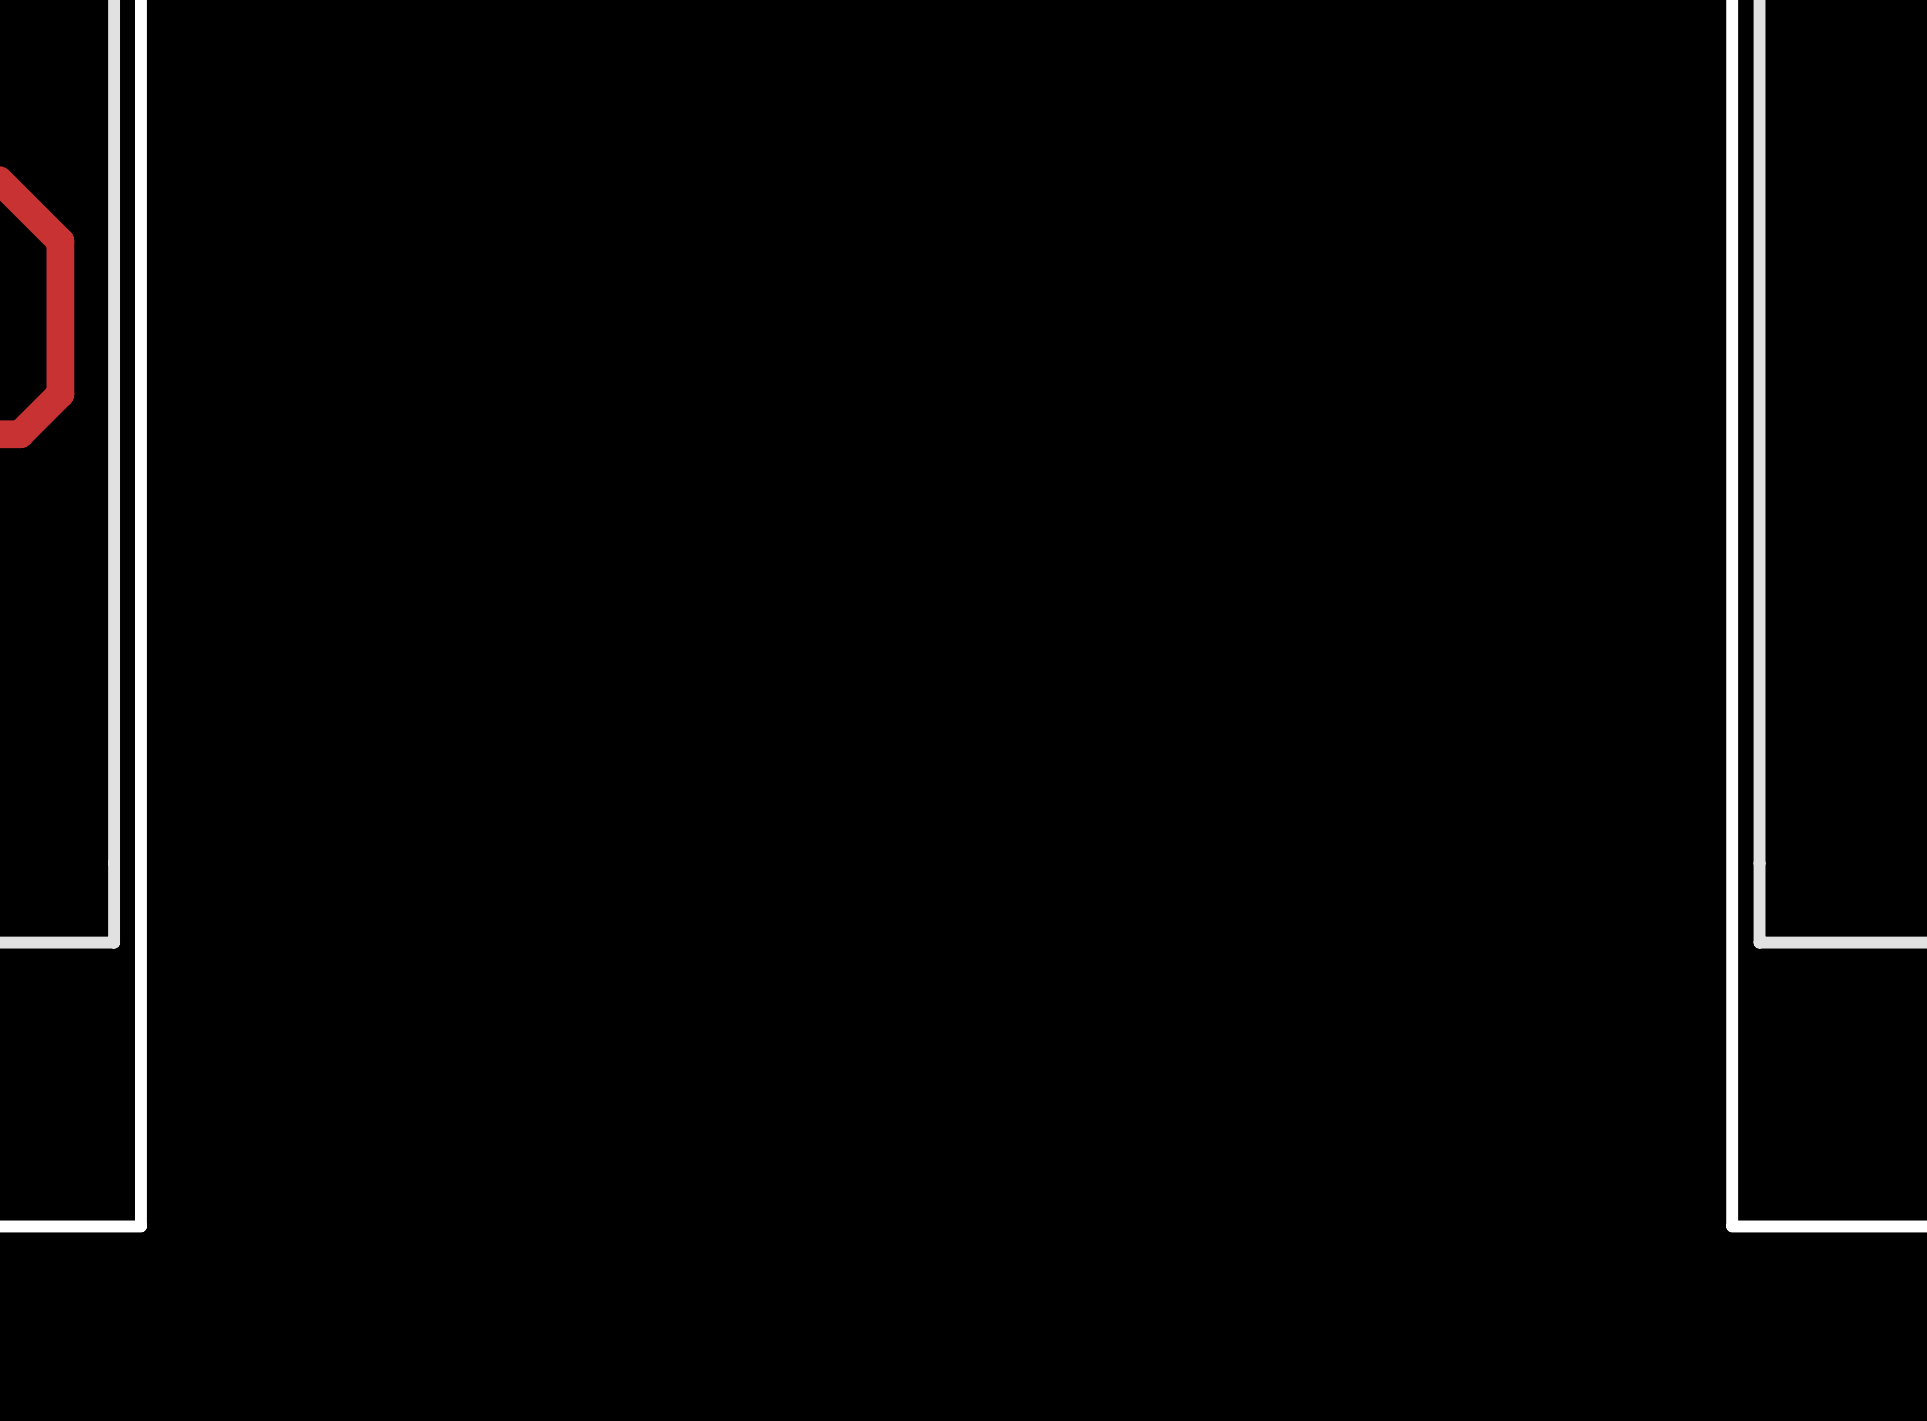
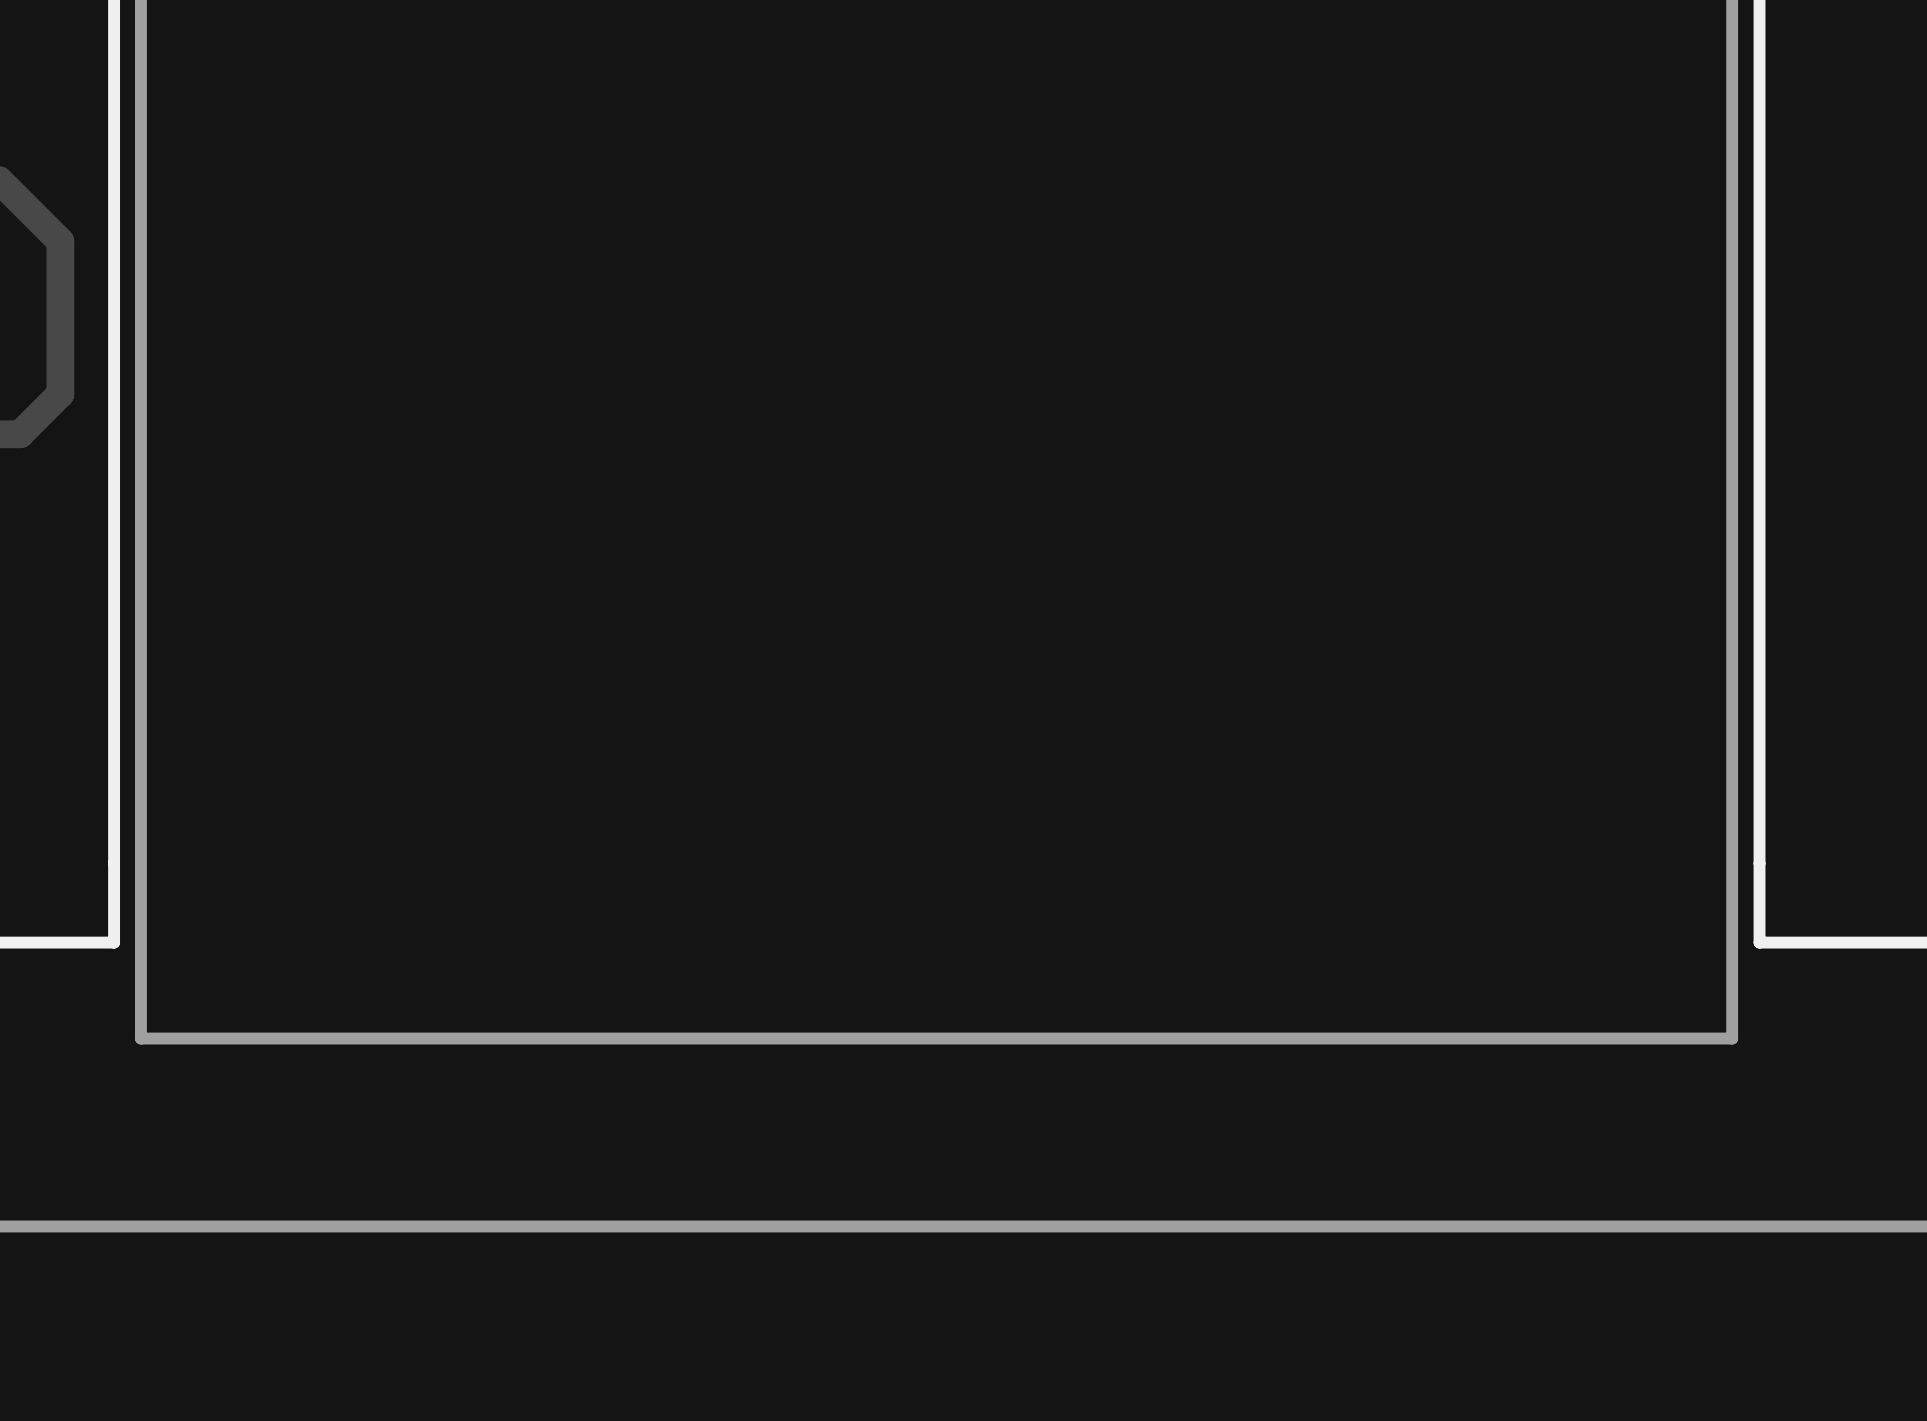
board edge: (140, 1038) (140, 1225) -> (140, 1038) (1732, 1038)
board edge: (1732, 1038) (1732, 1225) -> (140, 1226) (1732, 1226)

